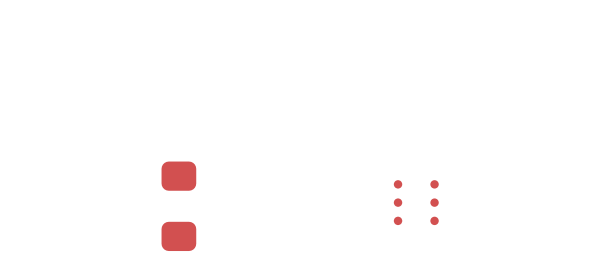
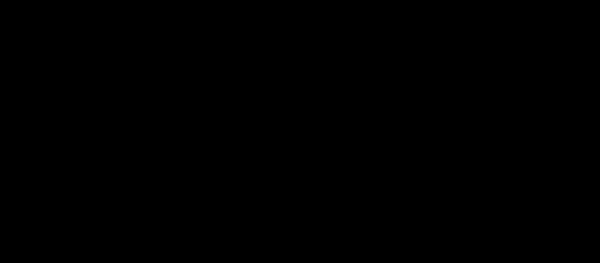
part: (416, 202) -> none
part: (178, 206) -> none

